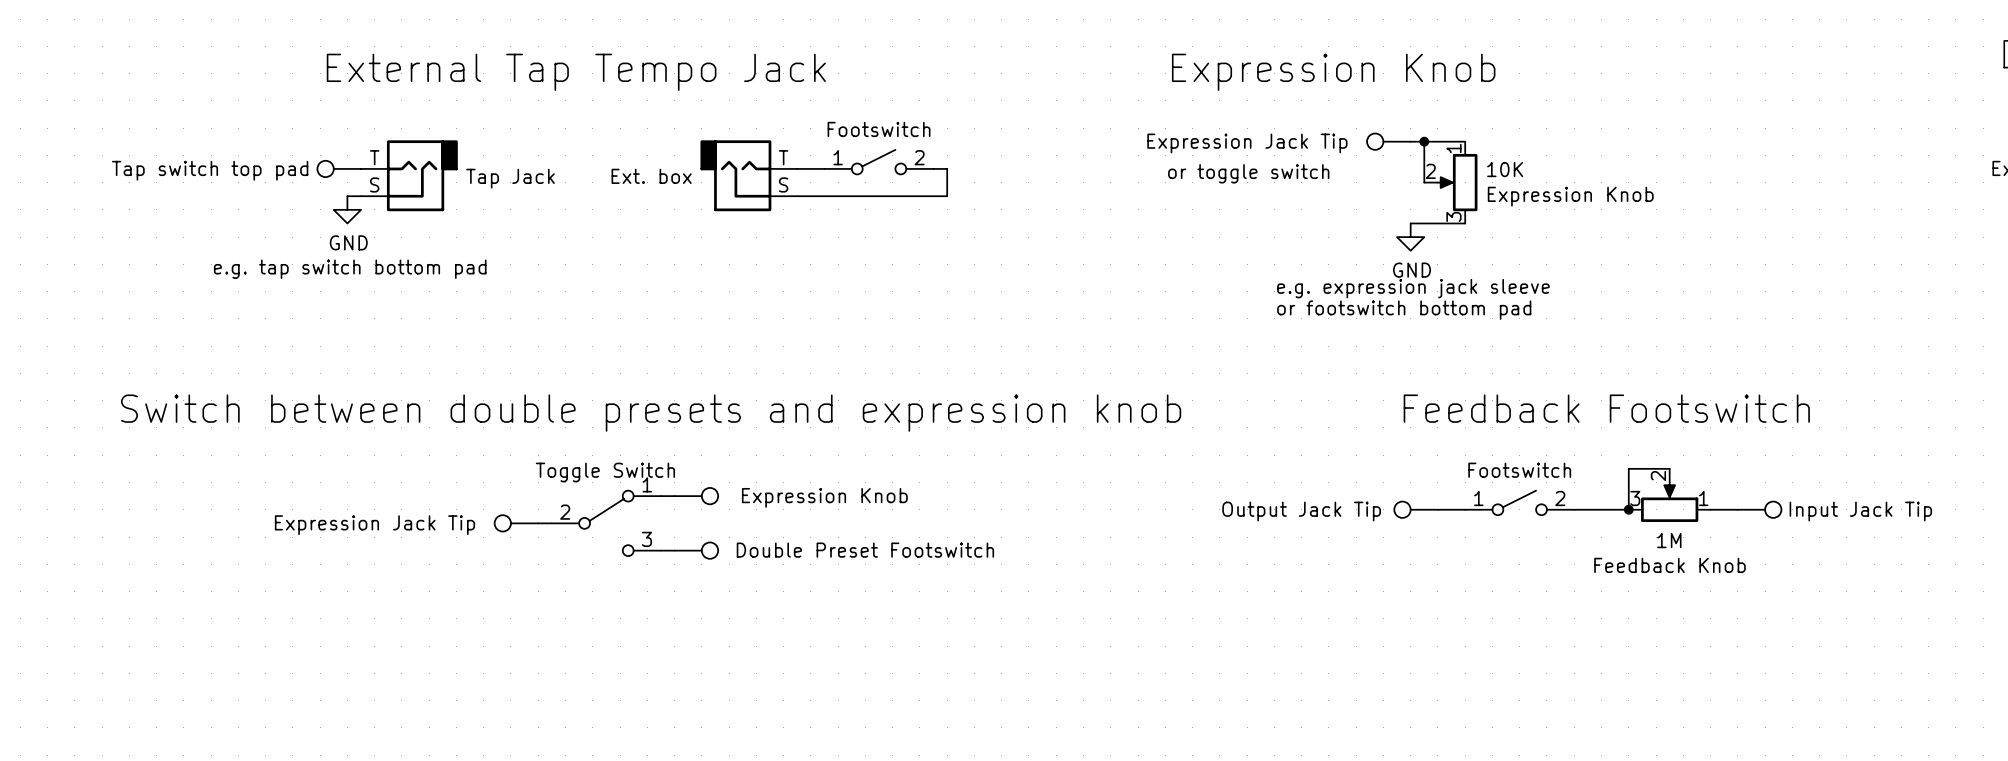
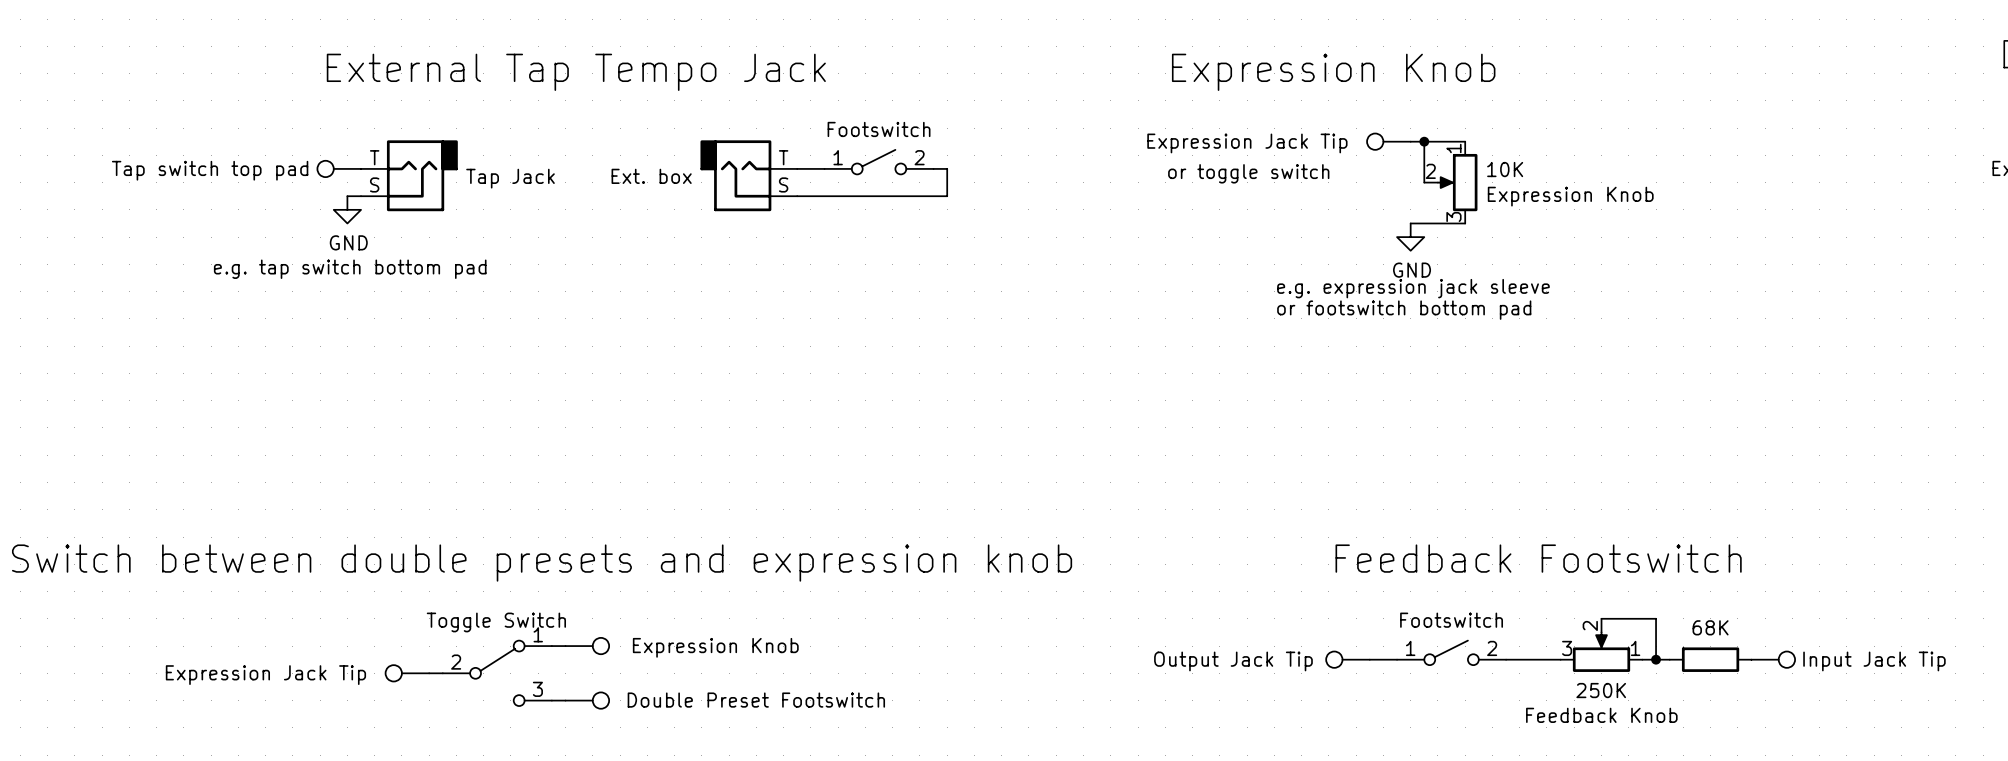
text position: Feedback Footswitch (1606, 408) -> Feedback Footswitch (1538, 558)
text position: Switch between double presets and expression knob (651, 413) -> Switch between double presets and expression knob (542, 563)
wire: (1669, 468) (1628, 468) (1628, 509) (1574, 509) -> none
1M: Feedback Knob (1669, 495) -> none
wire: (660, 496) (674, 496) -> (551, 646) (565, 646)
part position: (696, 496) -> (587, 646)
part position: (1519, 502) -> (1451, 652)
part position: (1416, 509) -> (1347, 659)
wire: (1437, 509) (1465, 509) -> (1369, 659) (1397, 659)
junction: (1628, 509) -> none
wire: (1710, 509) (1737, 509) -> (1642, 659) (1669, 659)
part position: (1759, 509) -> (1773, 659)
part position: (516, 523) -> (407, 673)
wire: (538, 523) (551, 523) -> (429, 673) (442, 673)
part position: (606, 523) -> (497, 673)
wire: (660, 550) (674, 550) -> (551, 700) (565, 700)
part position: (696, 550) -> (587, 700)
wire: none -> (1601, 618) (1656, 618) (1656, 659)
250K: none -> Feedback Knob (1601, 645)
wire: none -> (1506, 659) (1560, 659)
junction: none -> (1656, 659)
part: none -> 68K (1710, 659)

